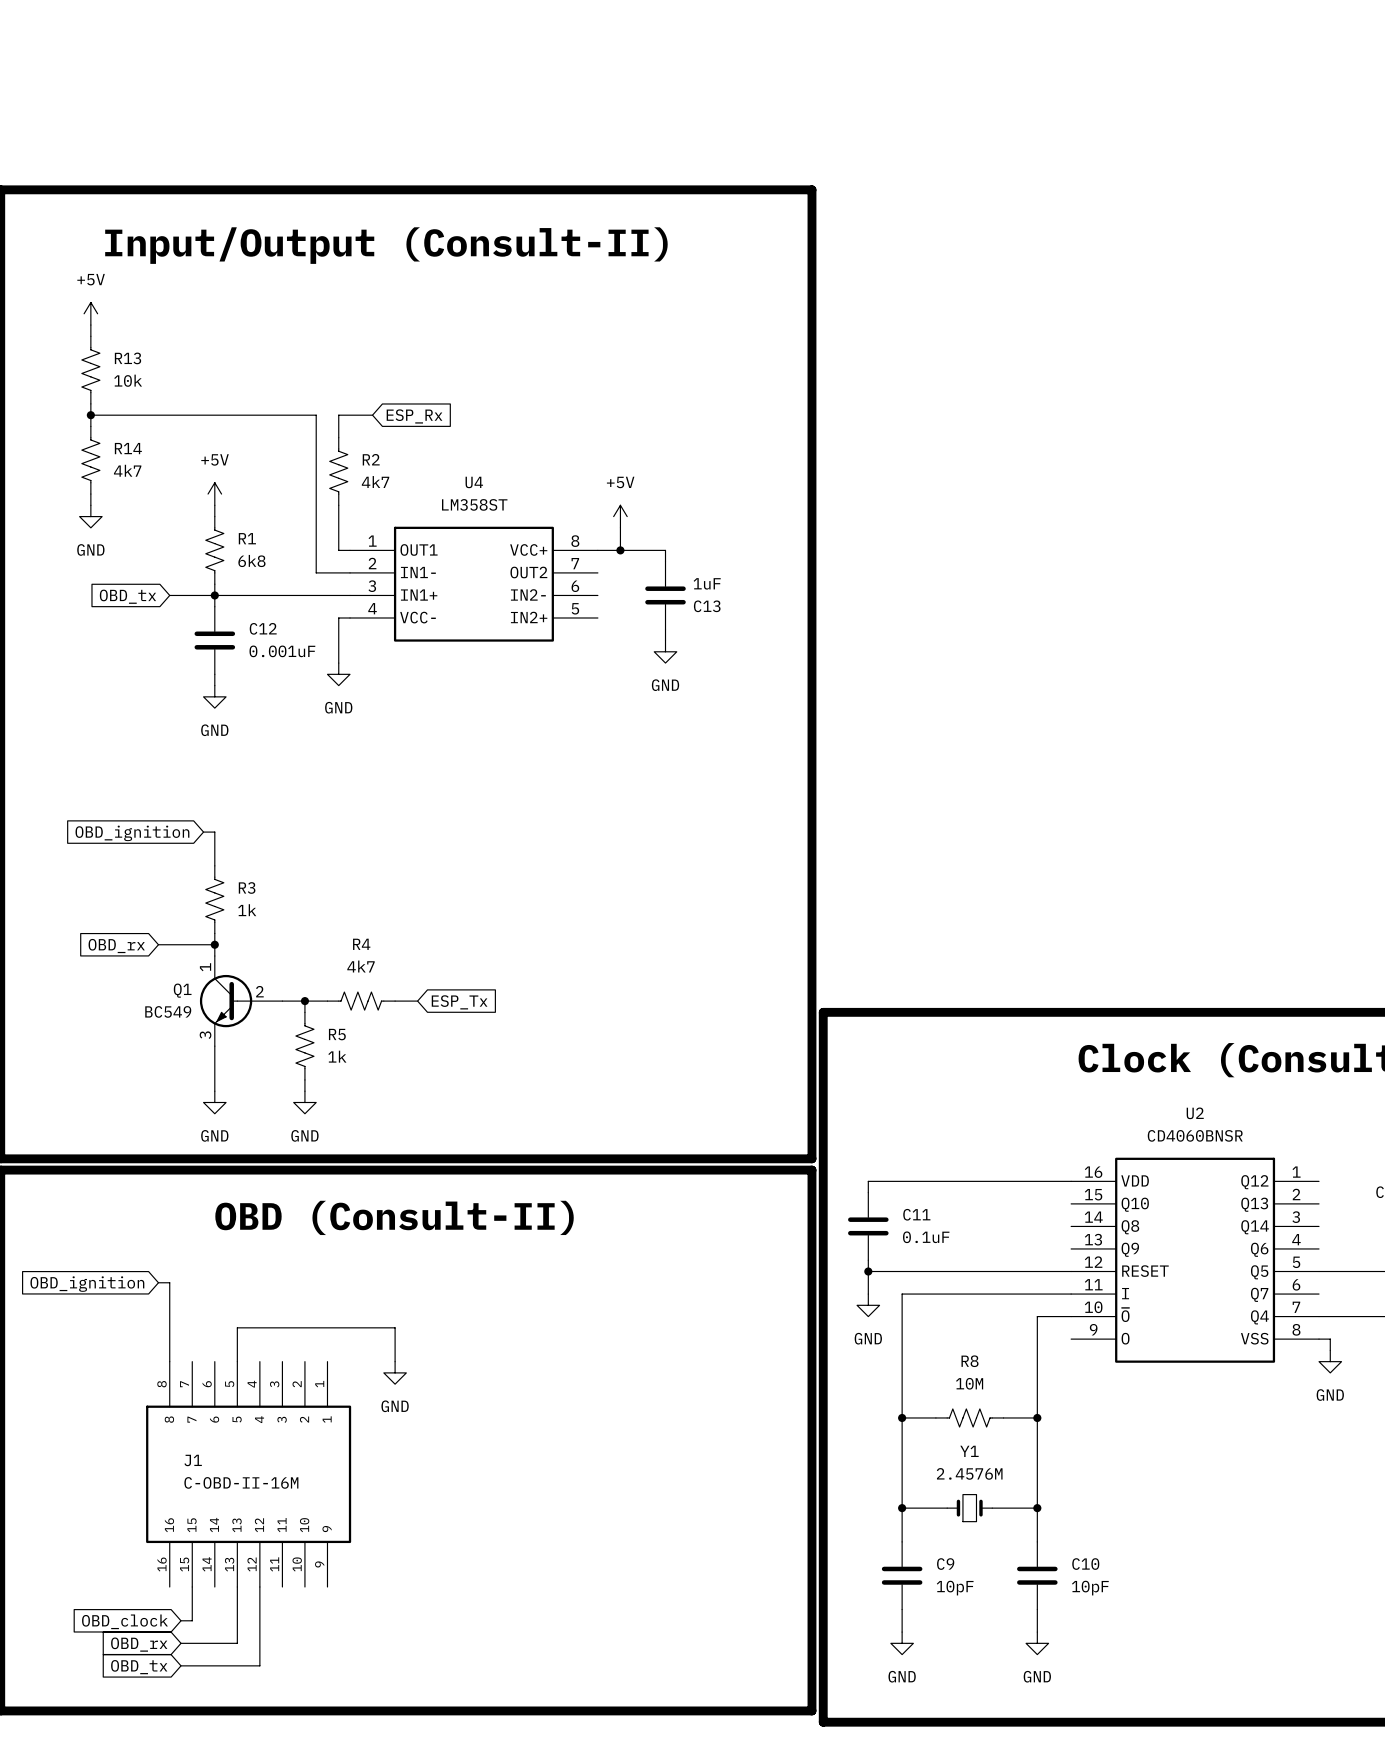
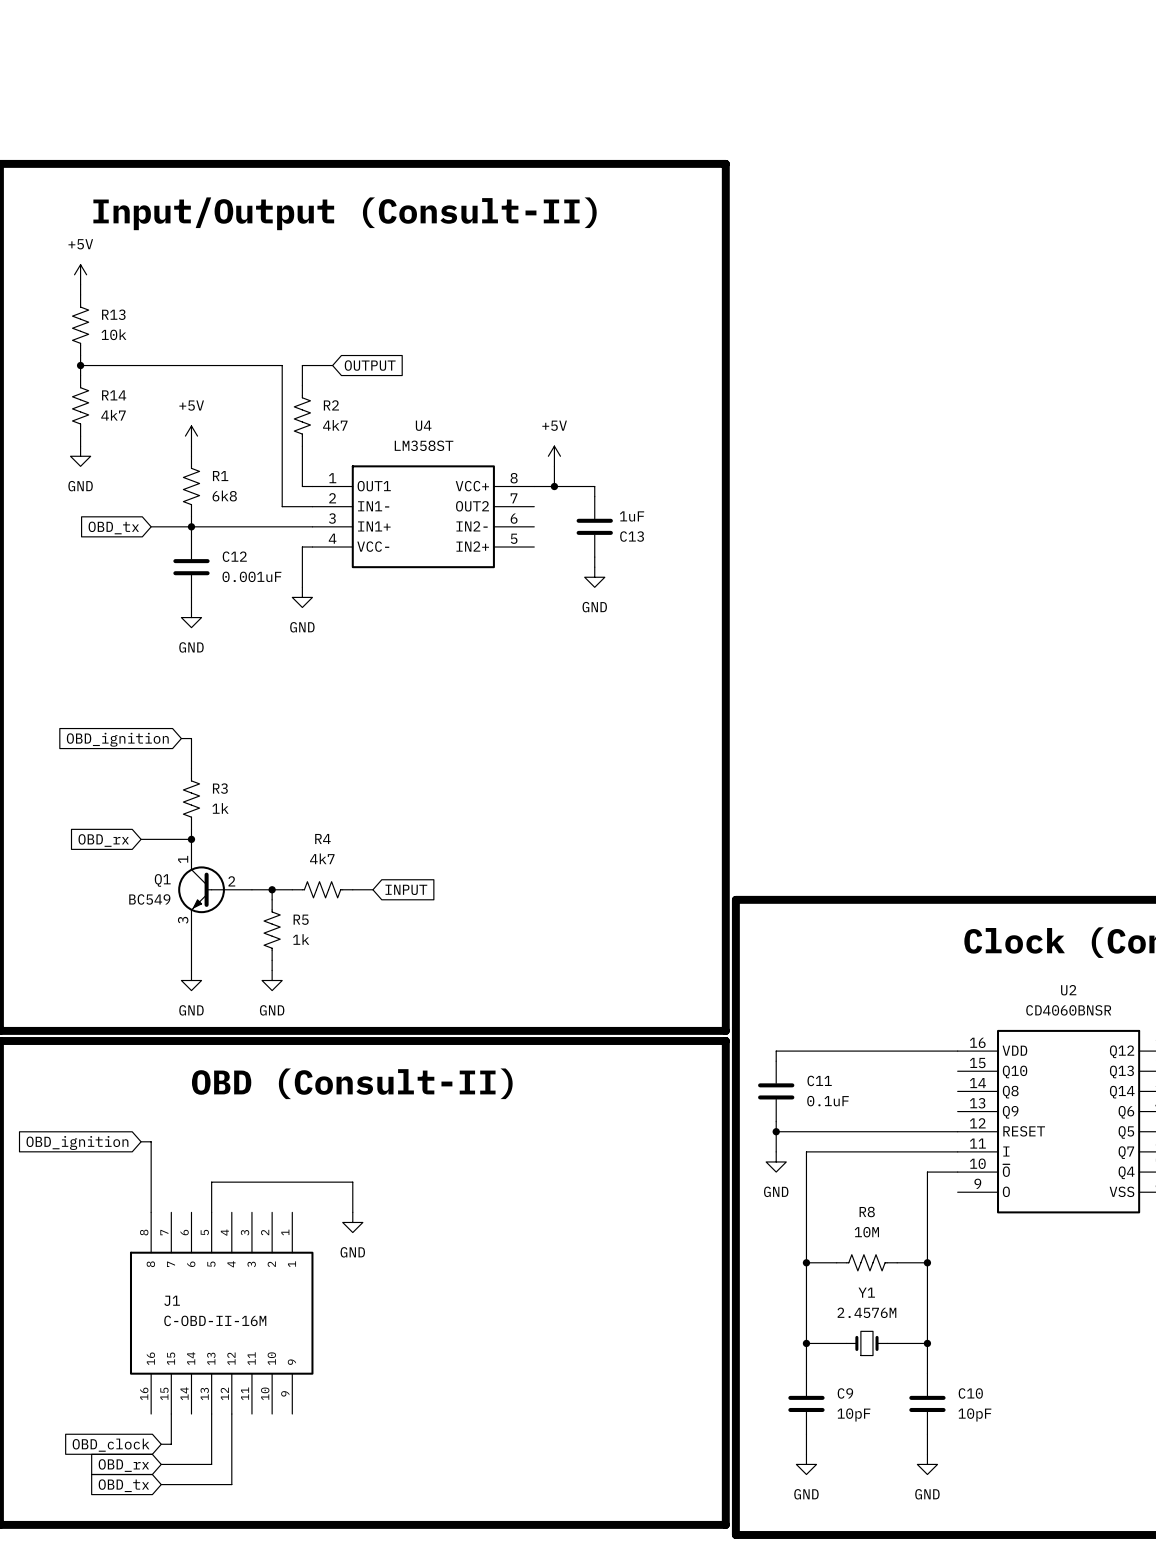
global label: ESP_Rx (414, 416) -> OUTPUT (370, 365)
global label: ESP_Tx (459, 1002) -> INPUT (406, 889)

